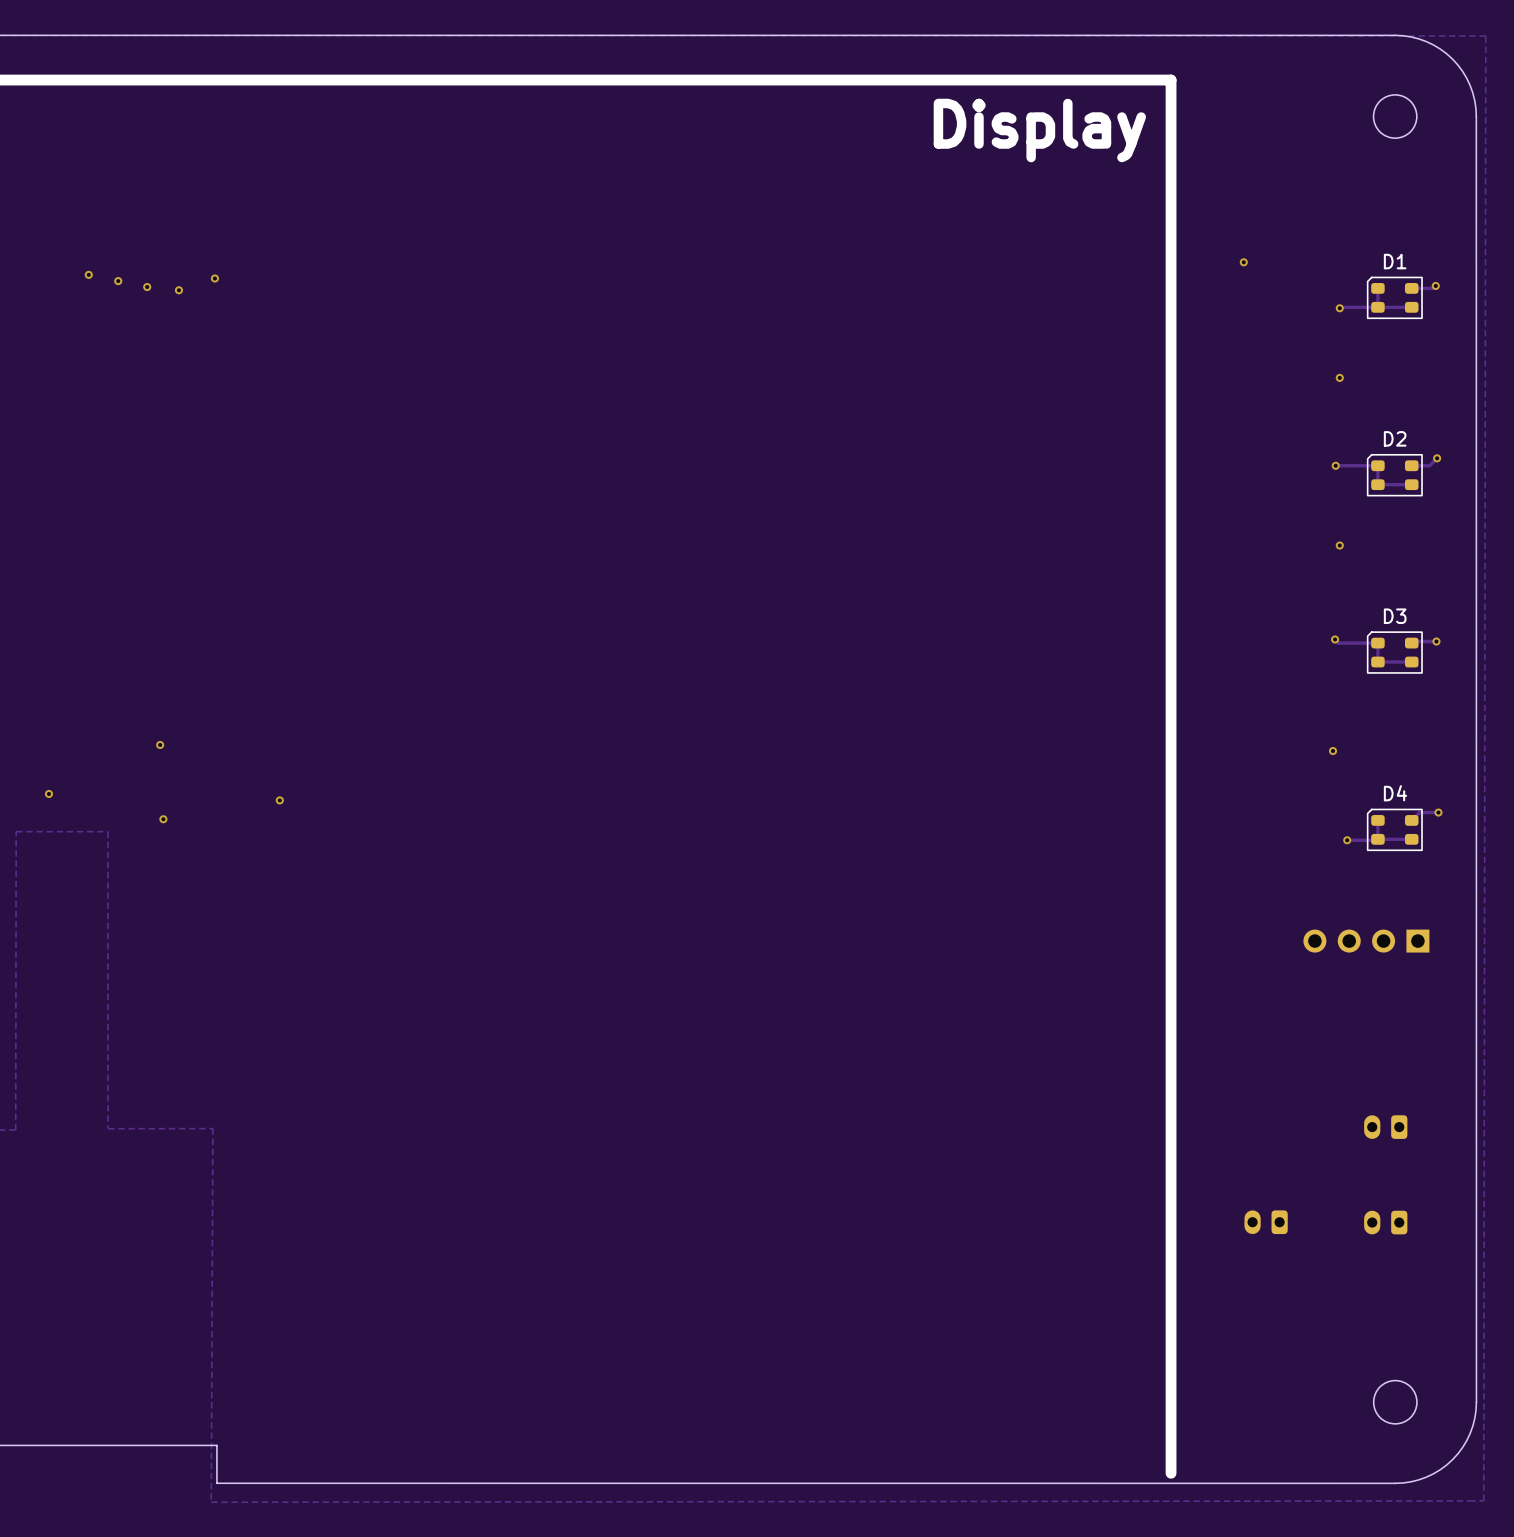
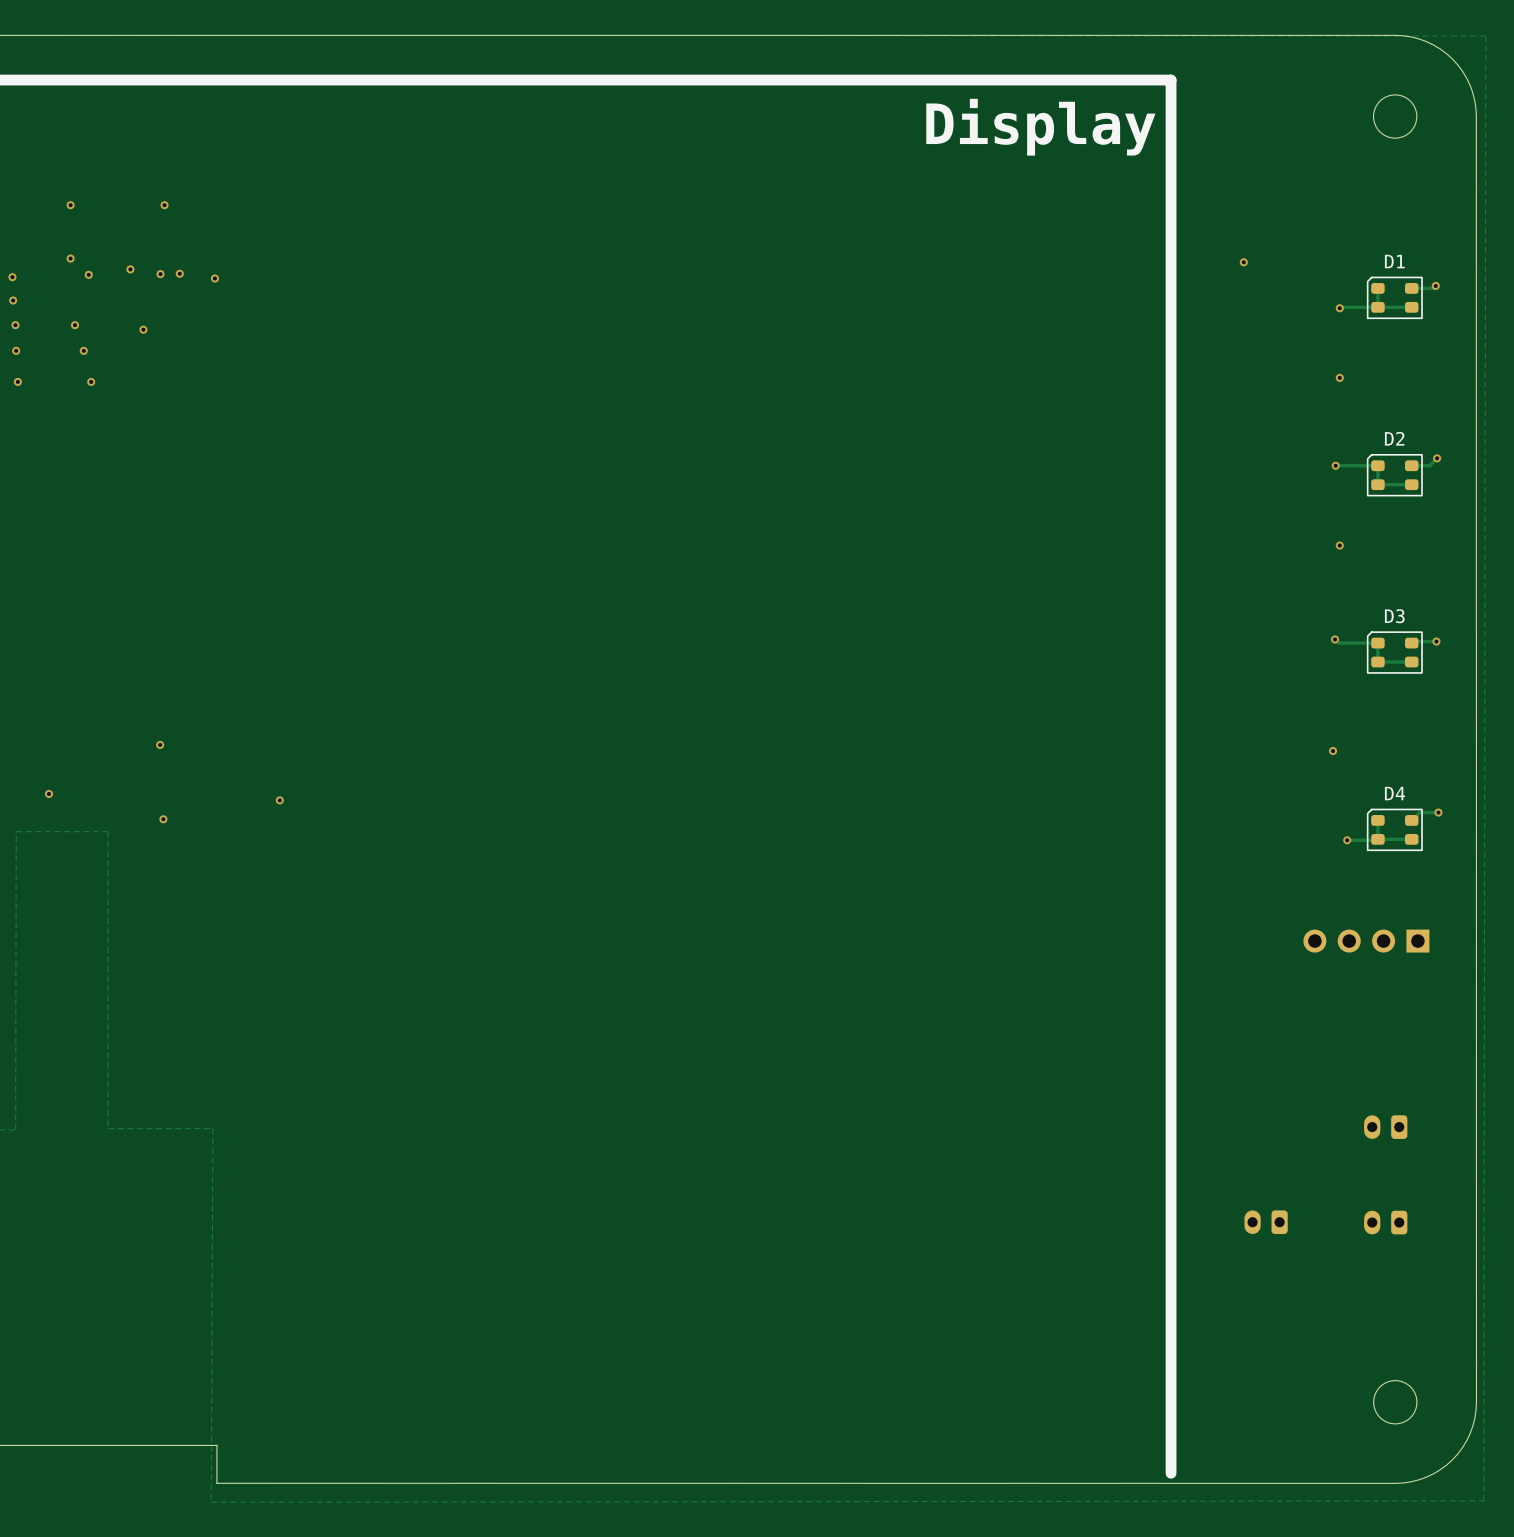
via: none -> (70, 205)
via: none -> (164, 205)
via: none -> (70, 258)
via: none -> (130, 269)
via: none -> (179, 273)
via: none -> (160, 274)
via: none -> (12, 277)
via: (118, 281) -> none
via: (147, 287) -> none
via: (178, 290) -> none
via: none -> (13, 300)
via: none -> (15, 325)
via: none -> (74, 325)
via: none -> (143, 329)
via: none -> (16, 350)
via: none -> (83, 350)
via: none -> (17, 381)
via: none -> (91, 381)

